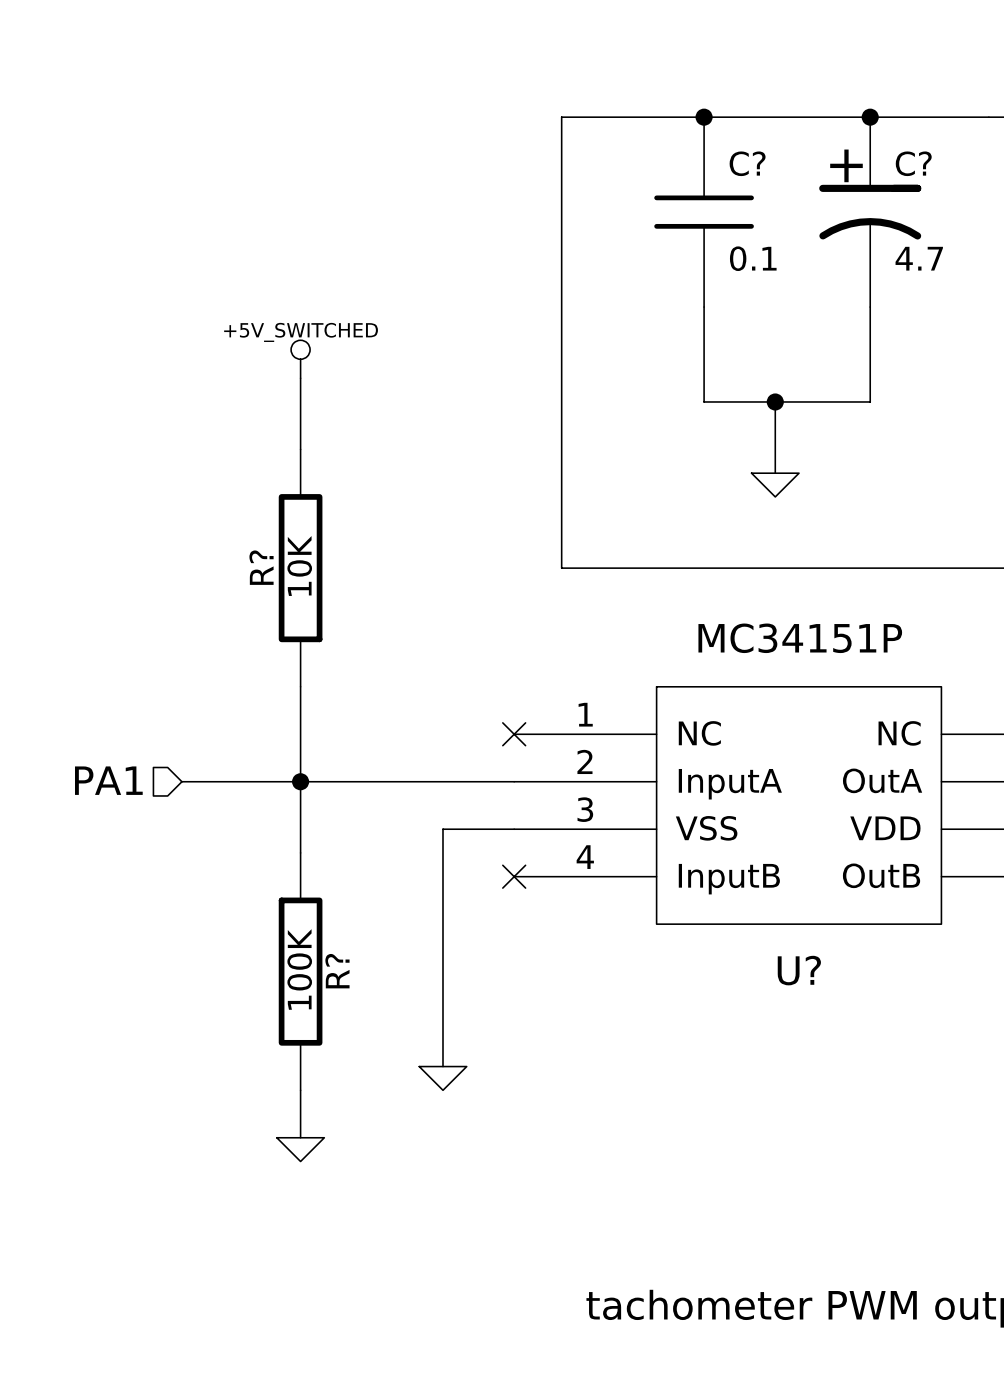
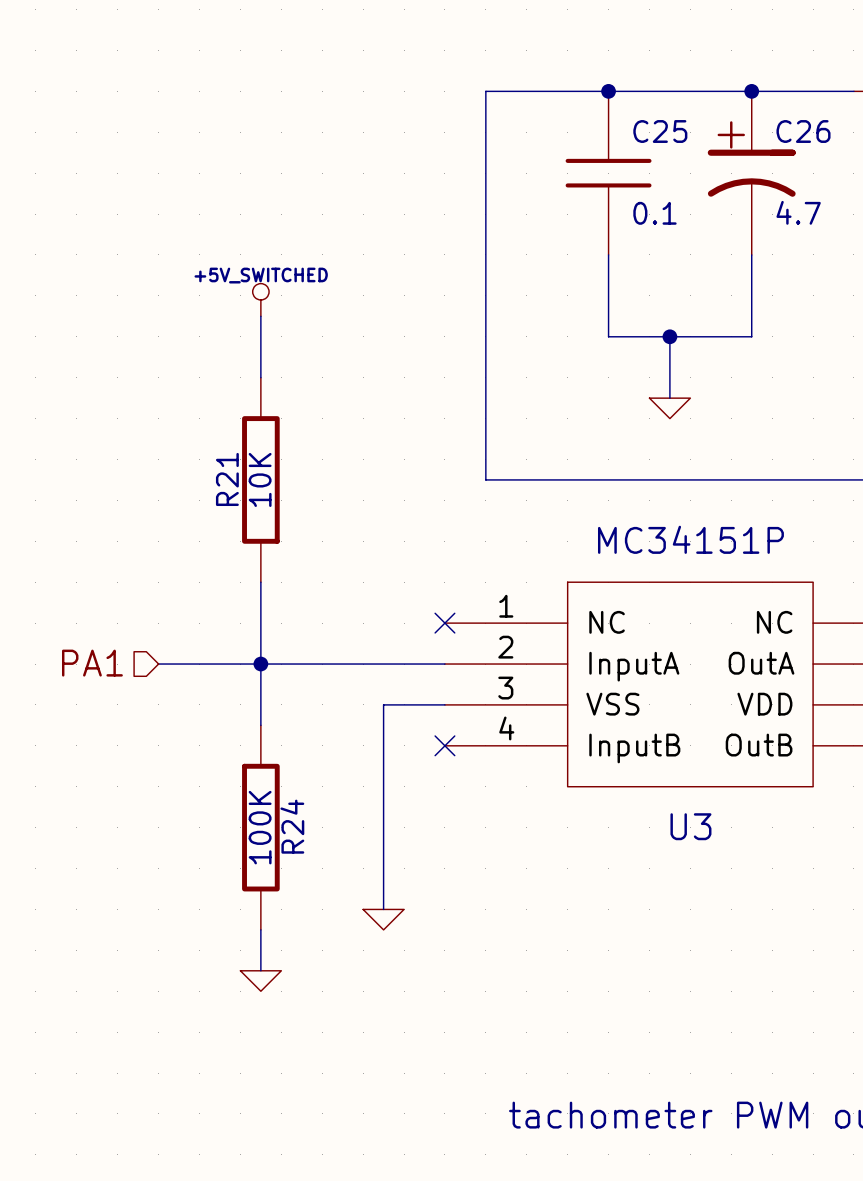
C? name: C? (747, 163) -> C25 (660, 131)
C? name: C? (913, 163) -> C26 (803, 131)
R? name: R? (261, 567) -> R21 (227, 479)
U? name: U? (799, 970) -> U3 (690, 826)
R? name: R? (337, 971) -> R24 (292, 826)

